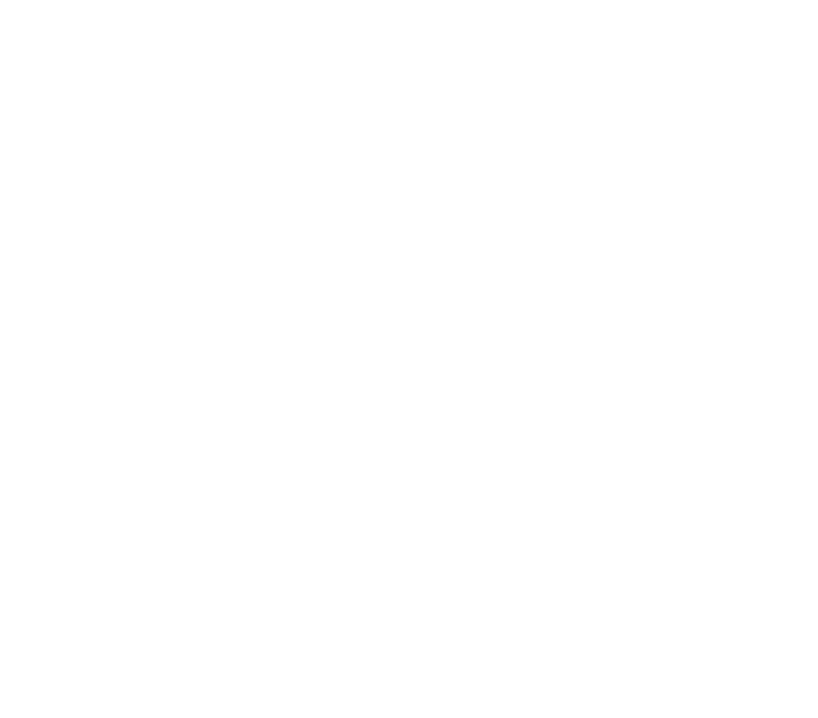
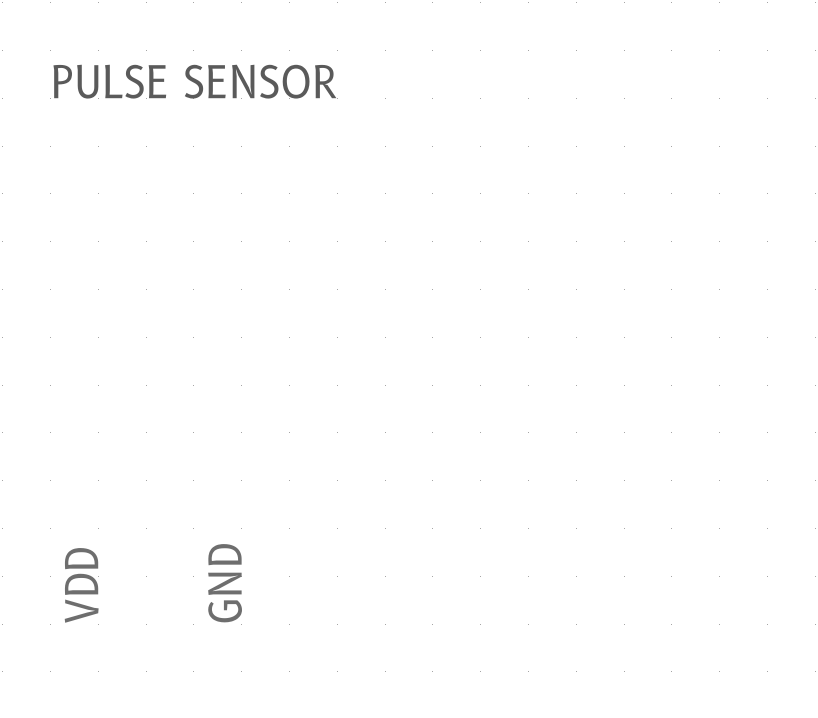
text: none -> PULSE SENSOR (194, 81)
label: none -> GND (225, 583)
label: none -> VDD (81, 585)

